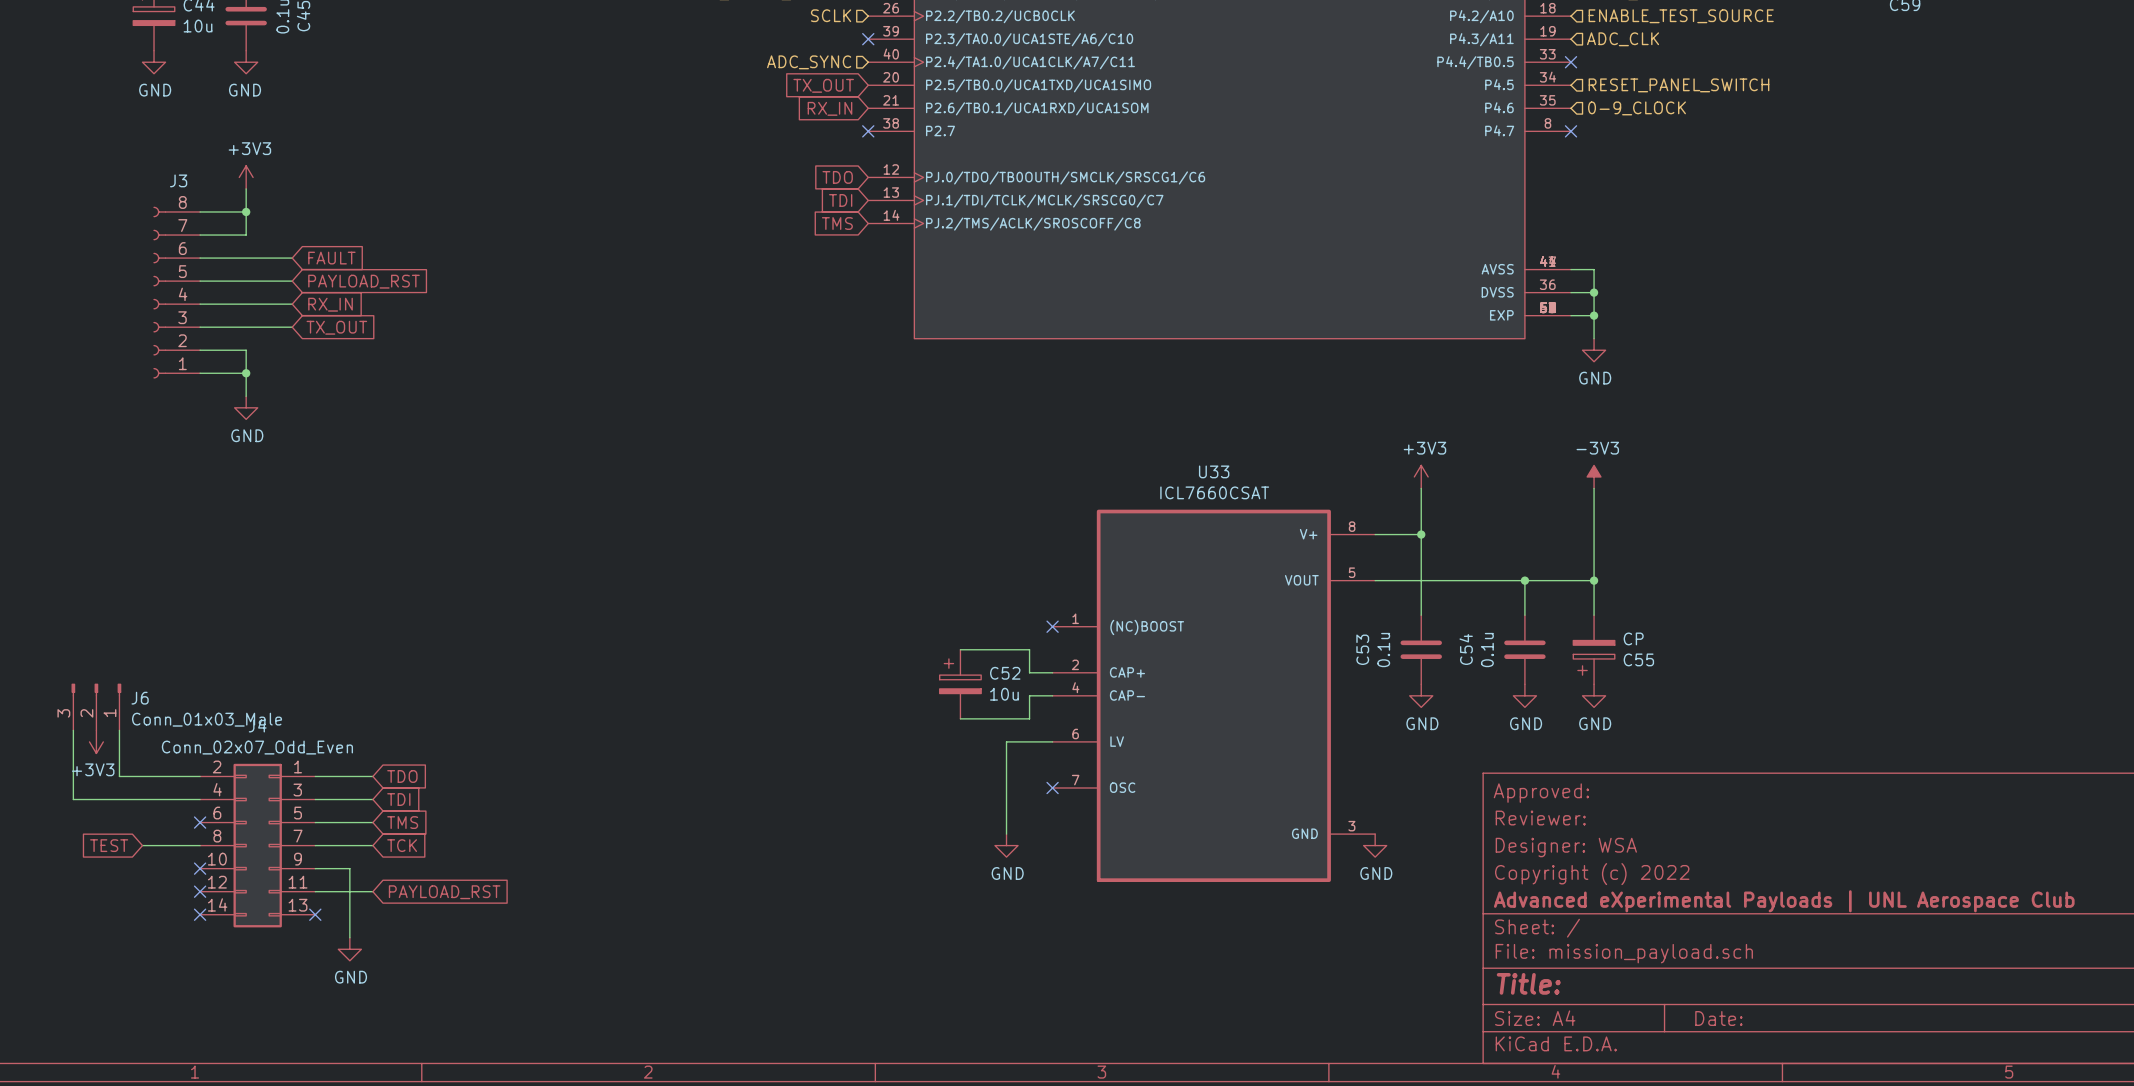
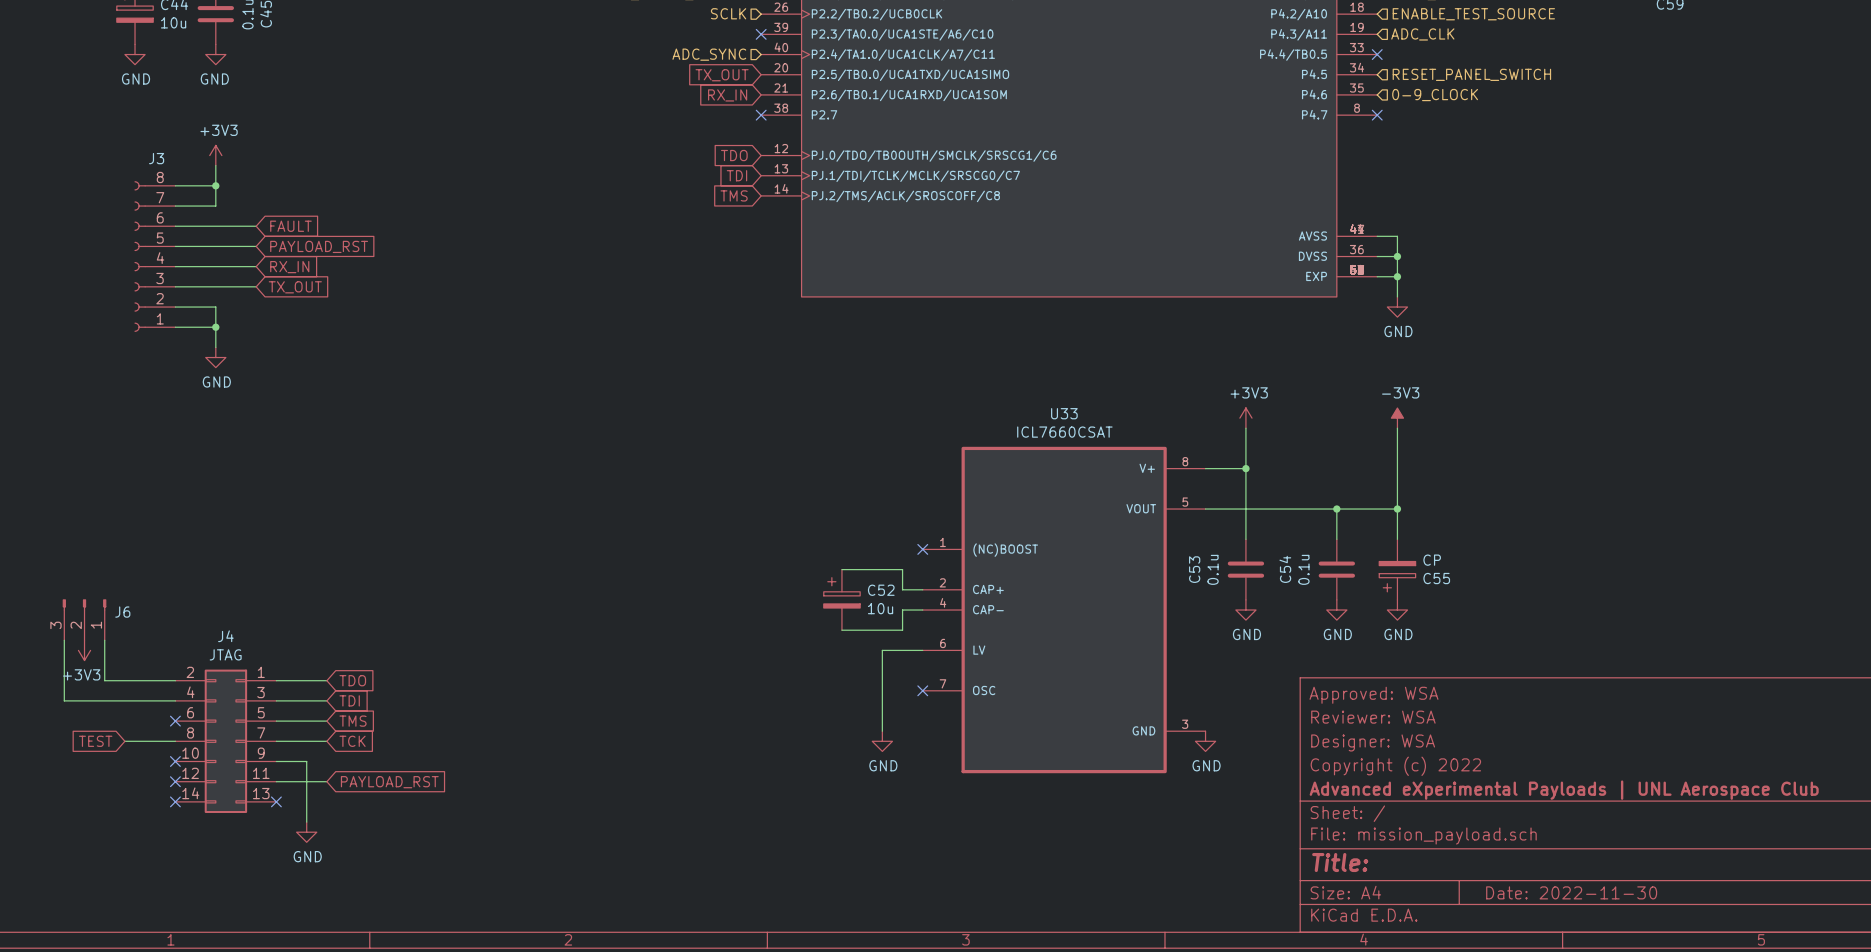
J6 value: Conn_01x03_Male (207, 719) -> none
J4 value: Conn_02x07_Odd_Even (257, 747) -> JTAG (225, 654)
title block: Approved: (1541, 793) -> Approved: WSA (1373, 695)
title block: Reviewer: (1540, 818) -> Reviewer: WSA (1373, 717)
title block: Date: (1718, 1018) -> Date: 2022-11-30 (1571, 892)

